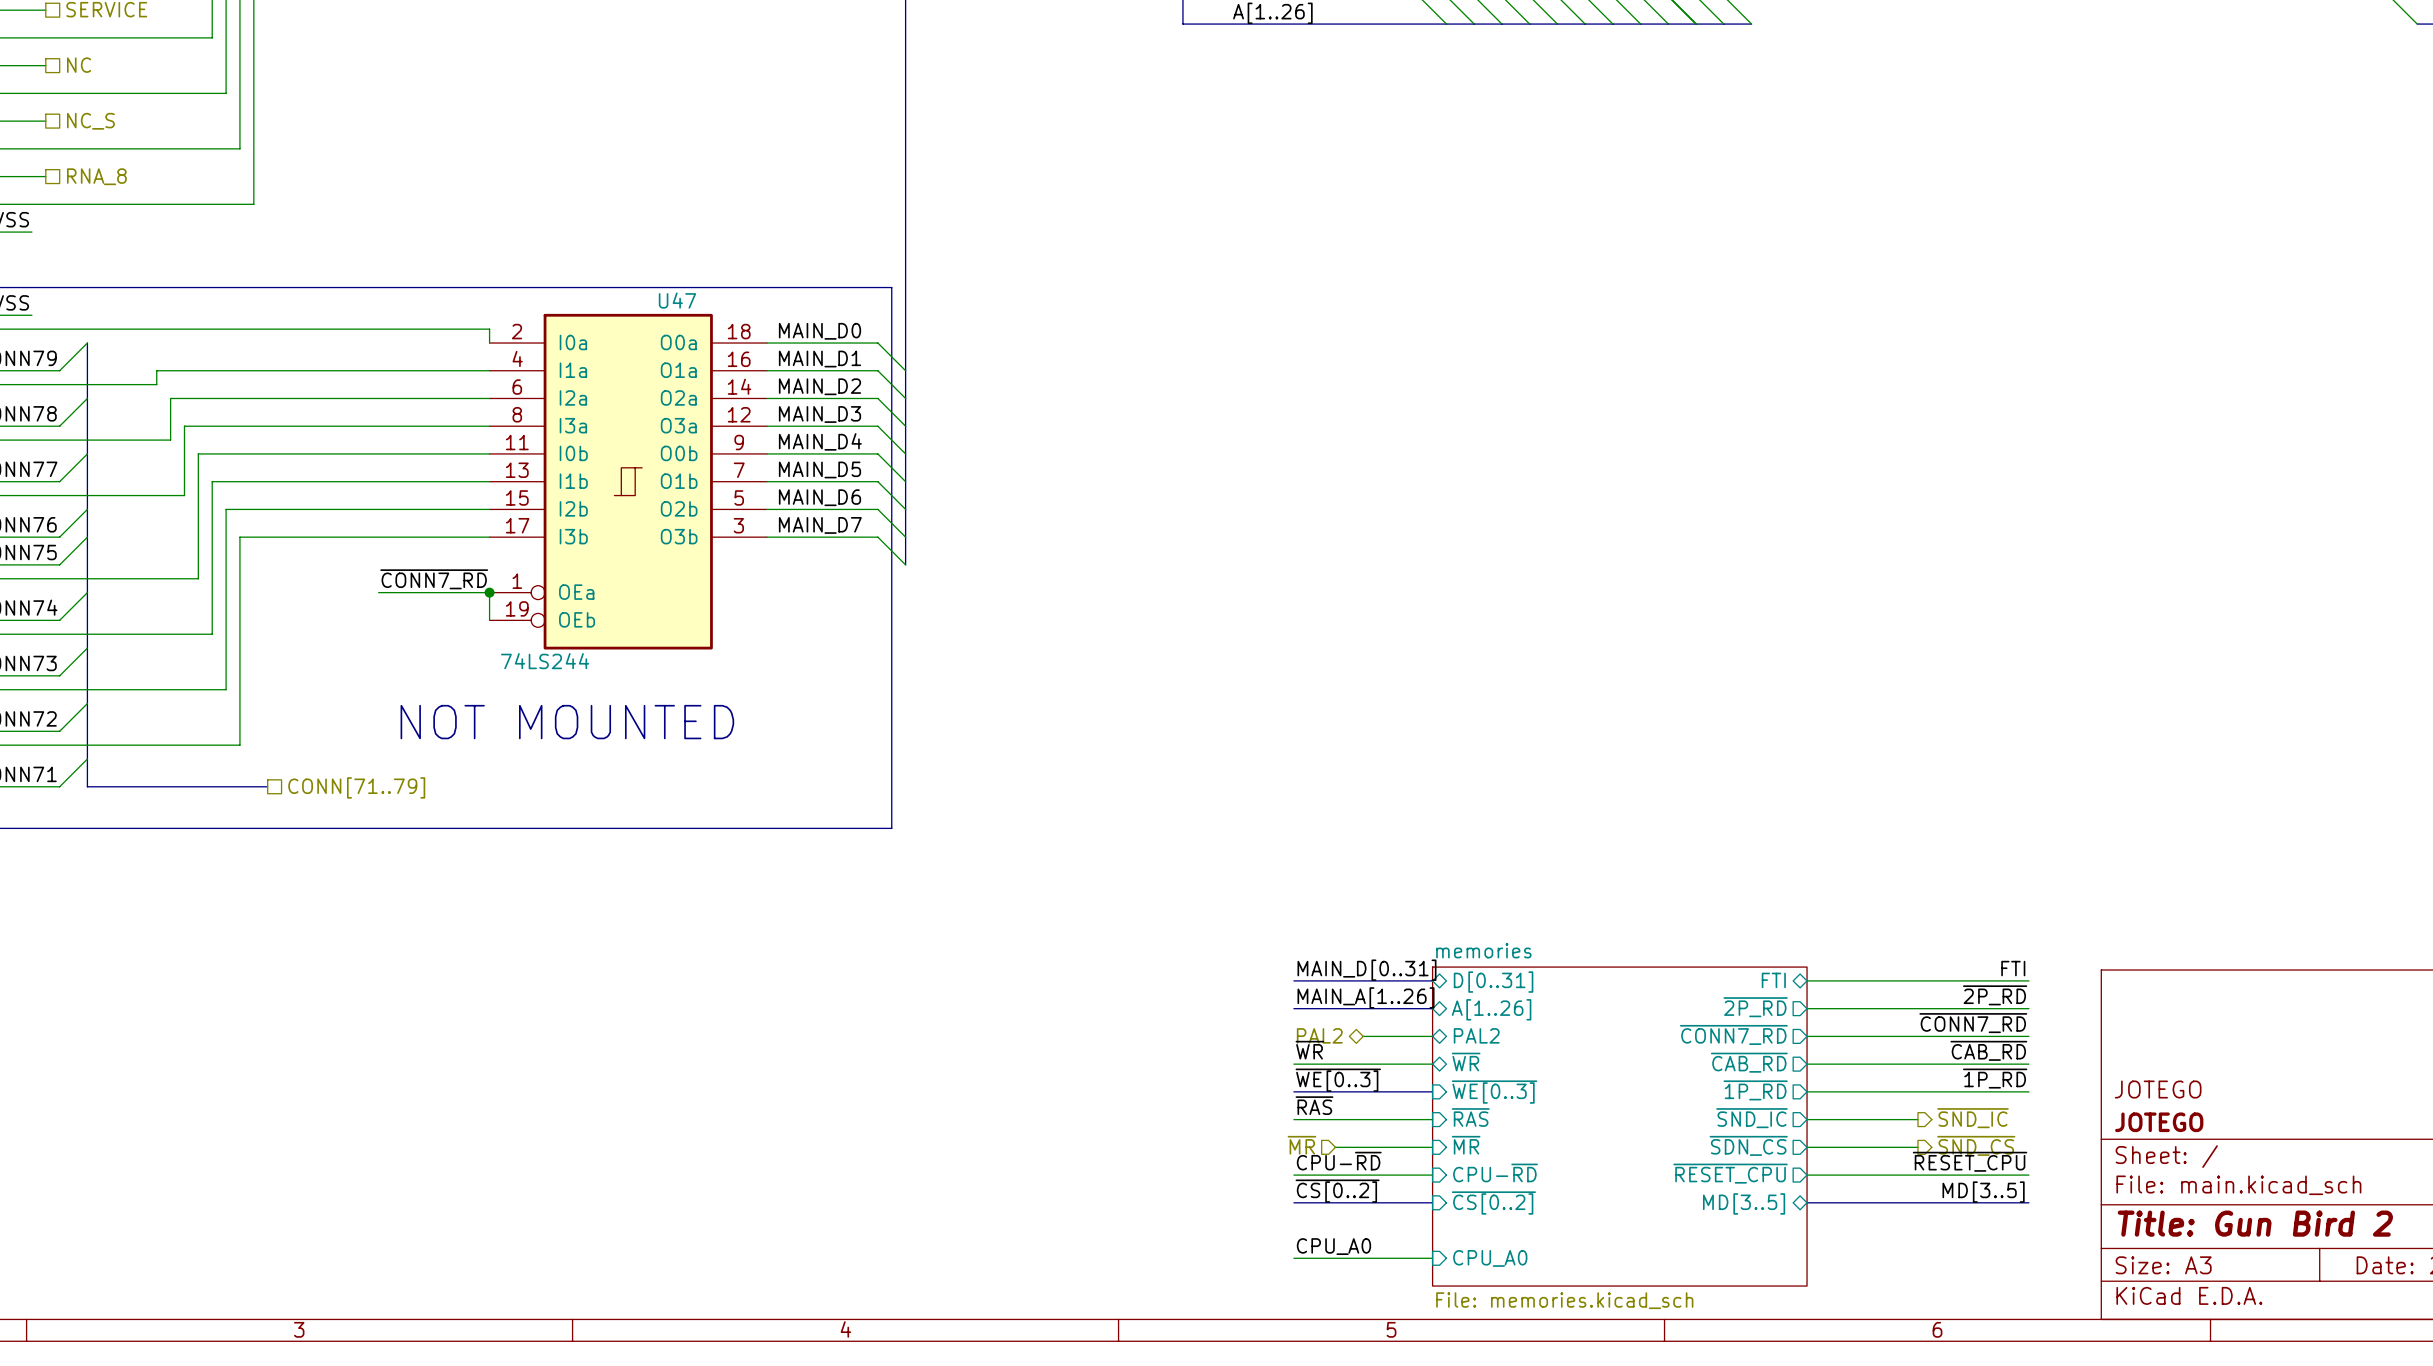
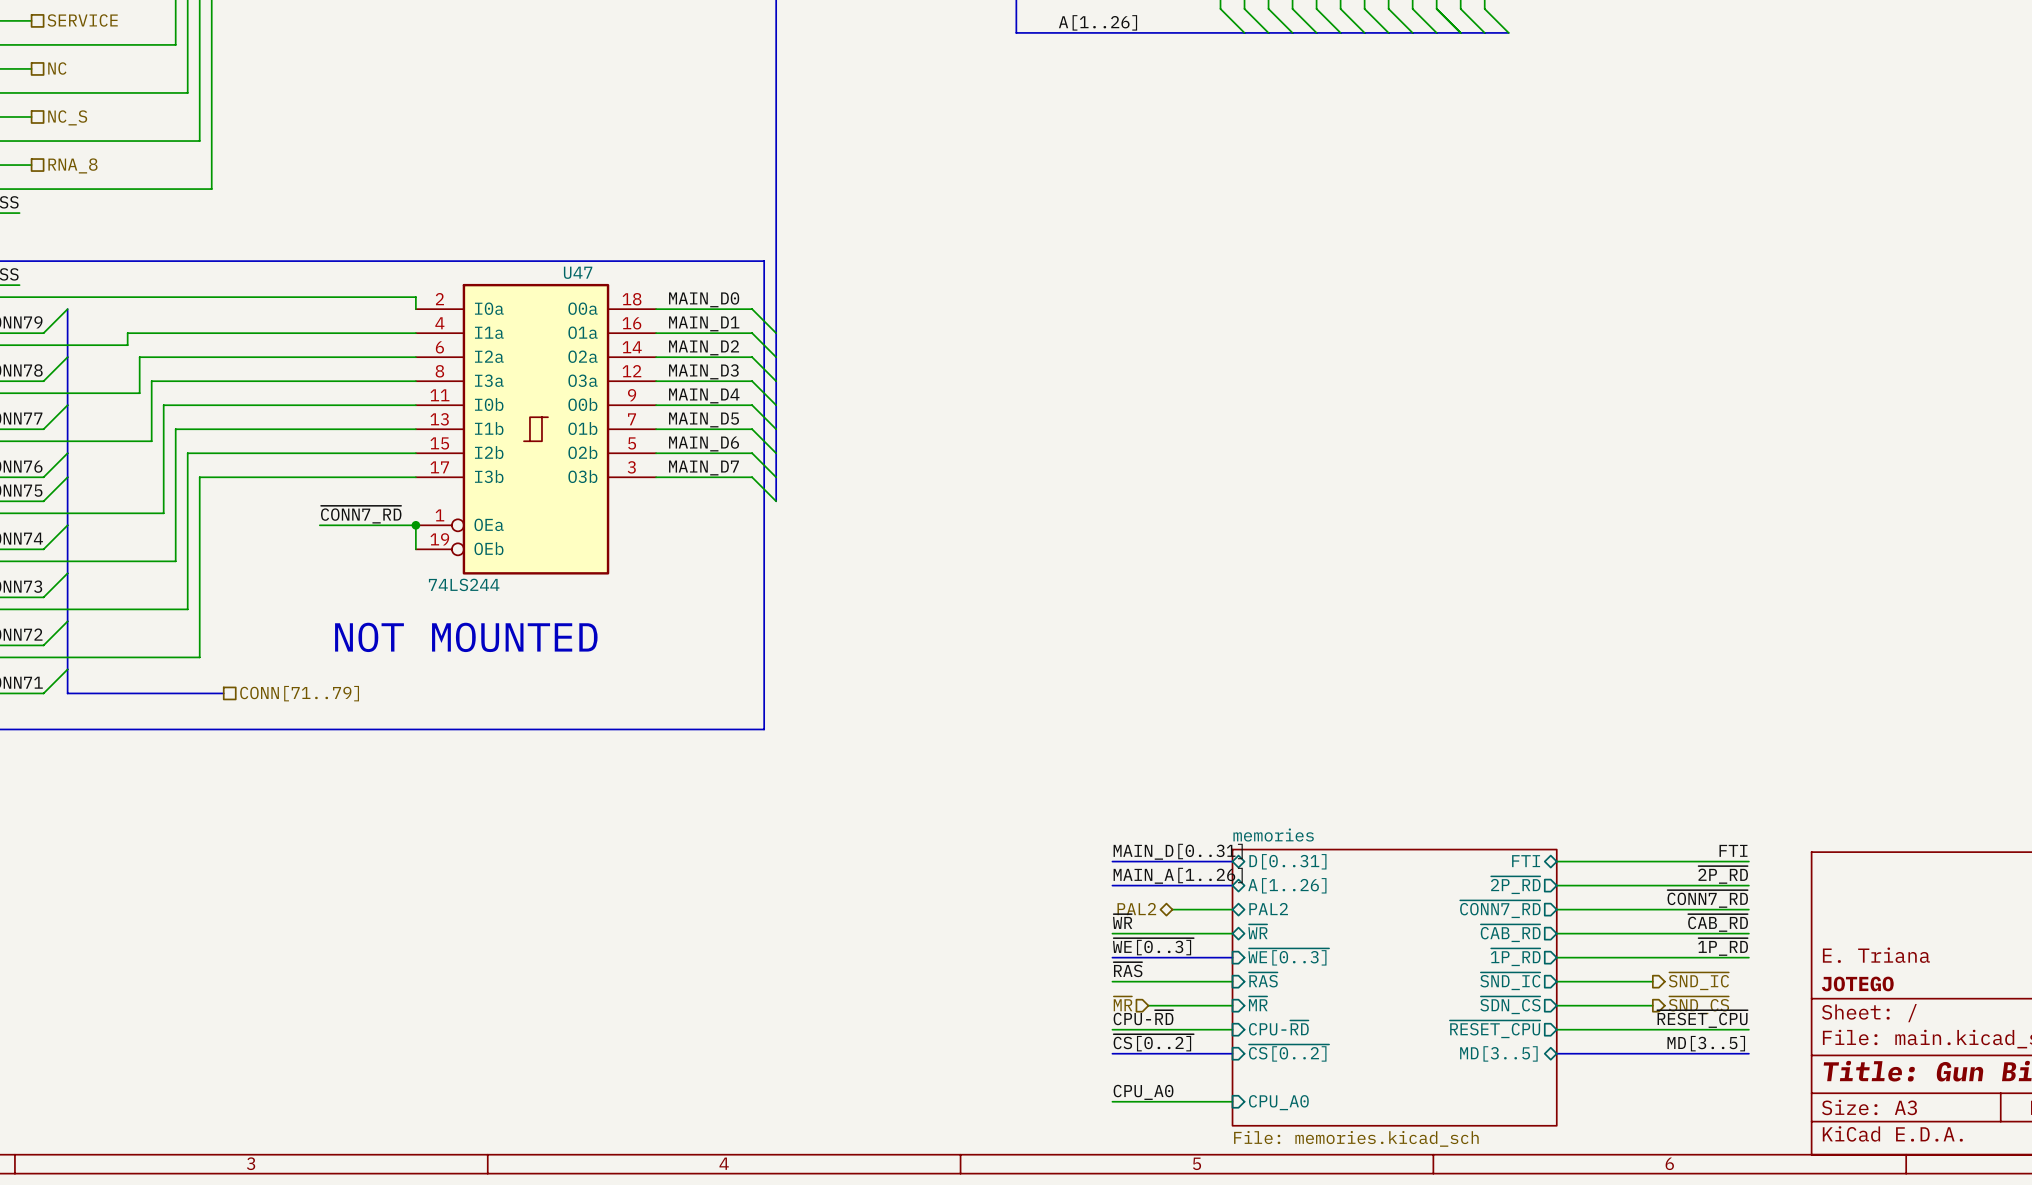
title block: JOTEGO (2158, 1089) -> E. Triana (1876, 955)

